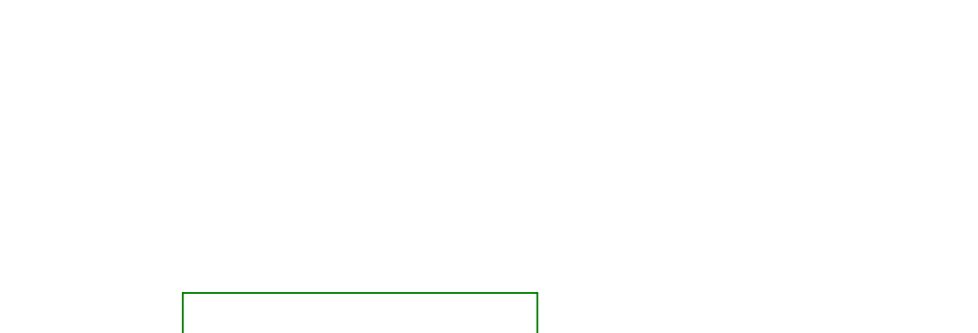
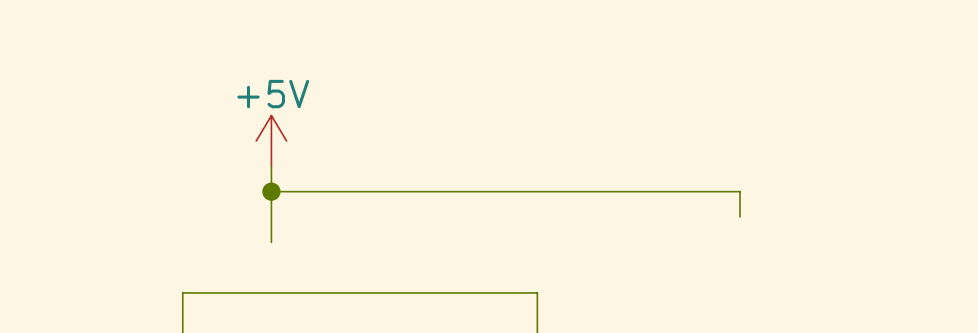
power symbol: none -> +5V (271, 141)
wire: none -> (271, 166) (271, 242)
wire: none -> (271, 191) (739, 191) (739, 216)
junction: none -> (271, 191)

